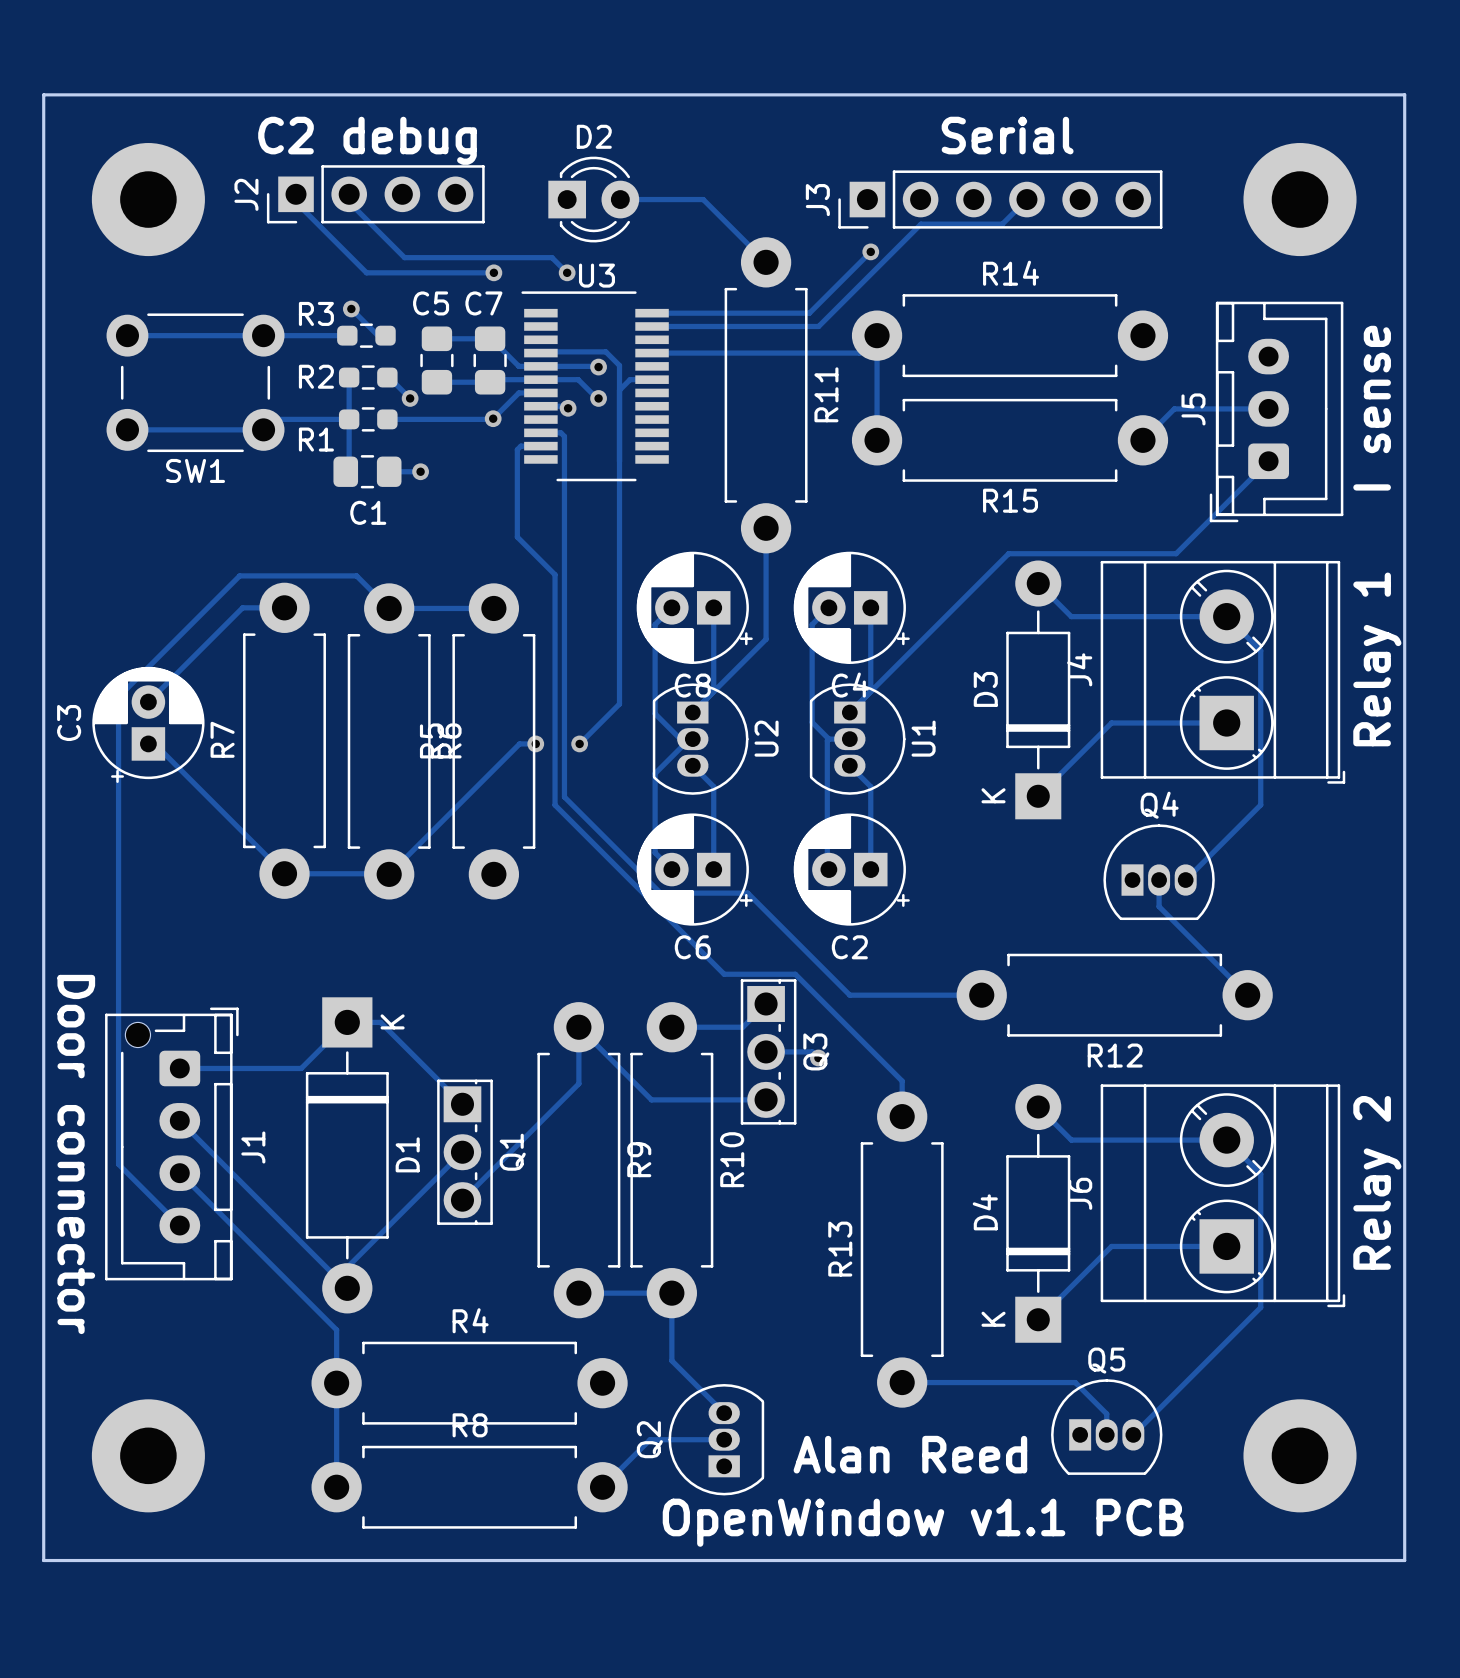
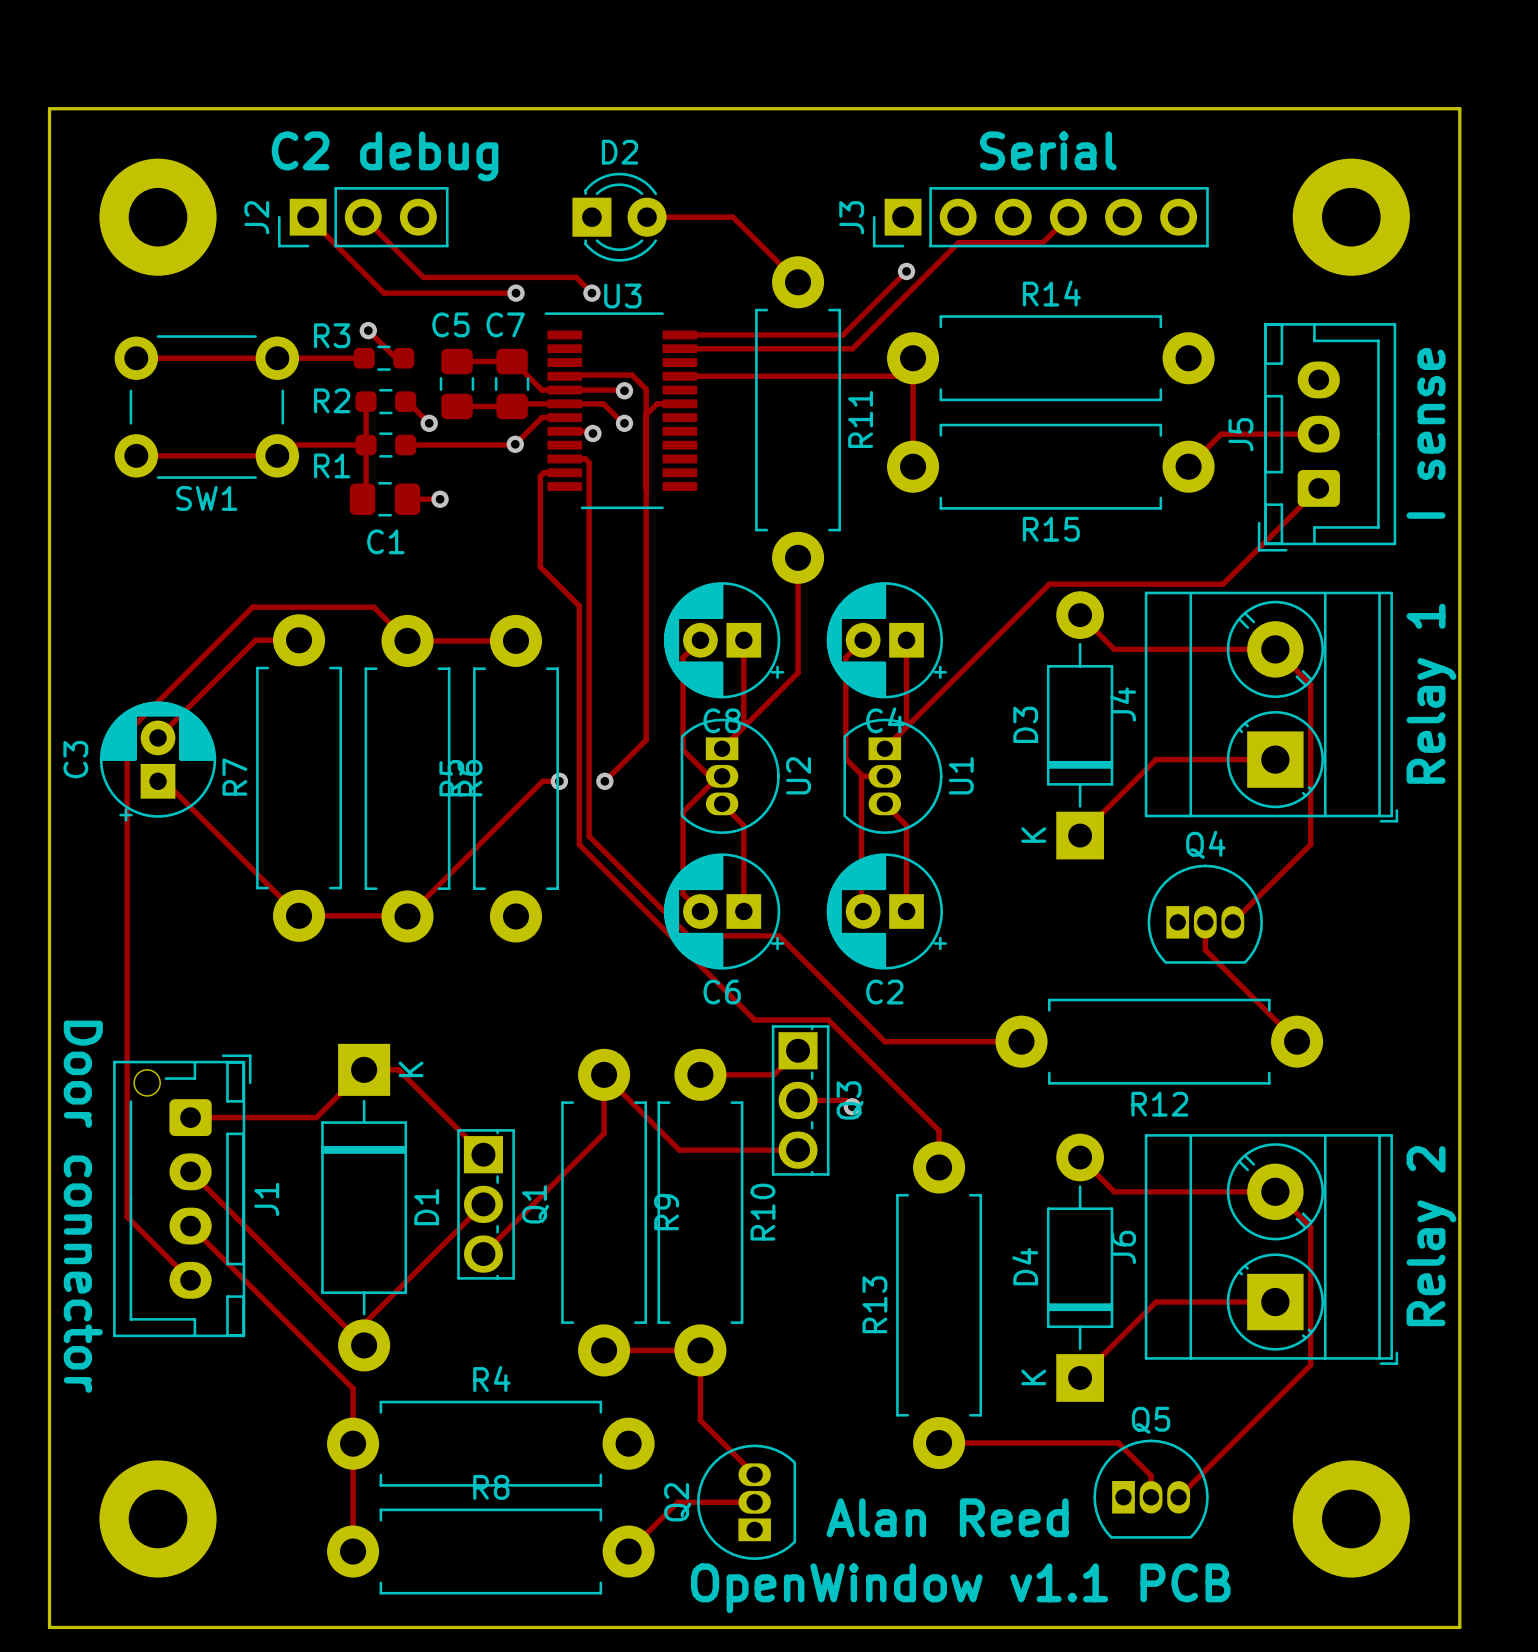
J2 footprint: [266, 165, 485, 224] -> [278, 187, 449, 248]

